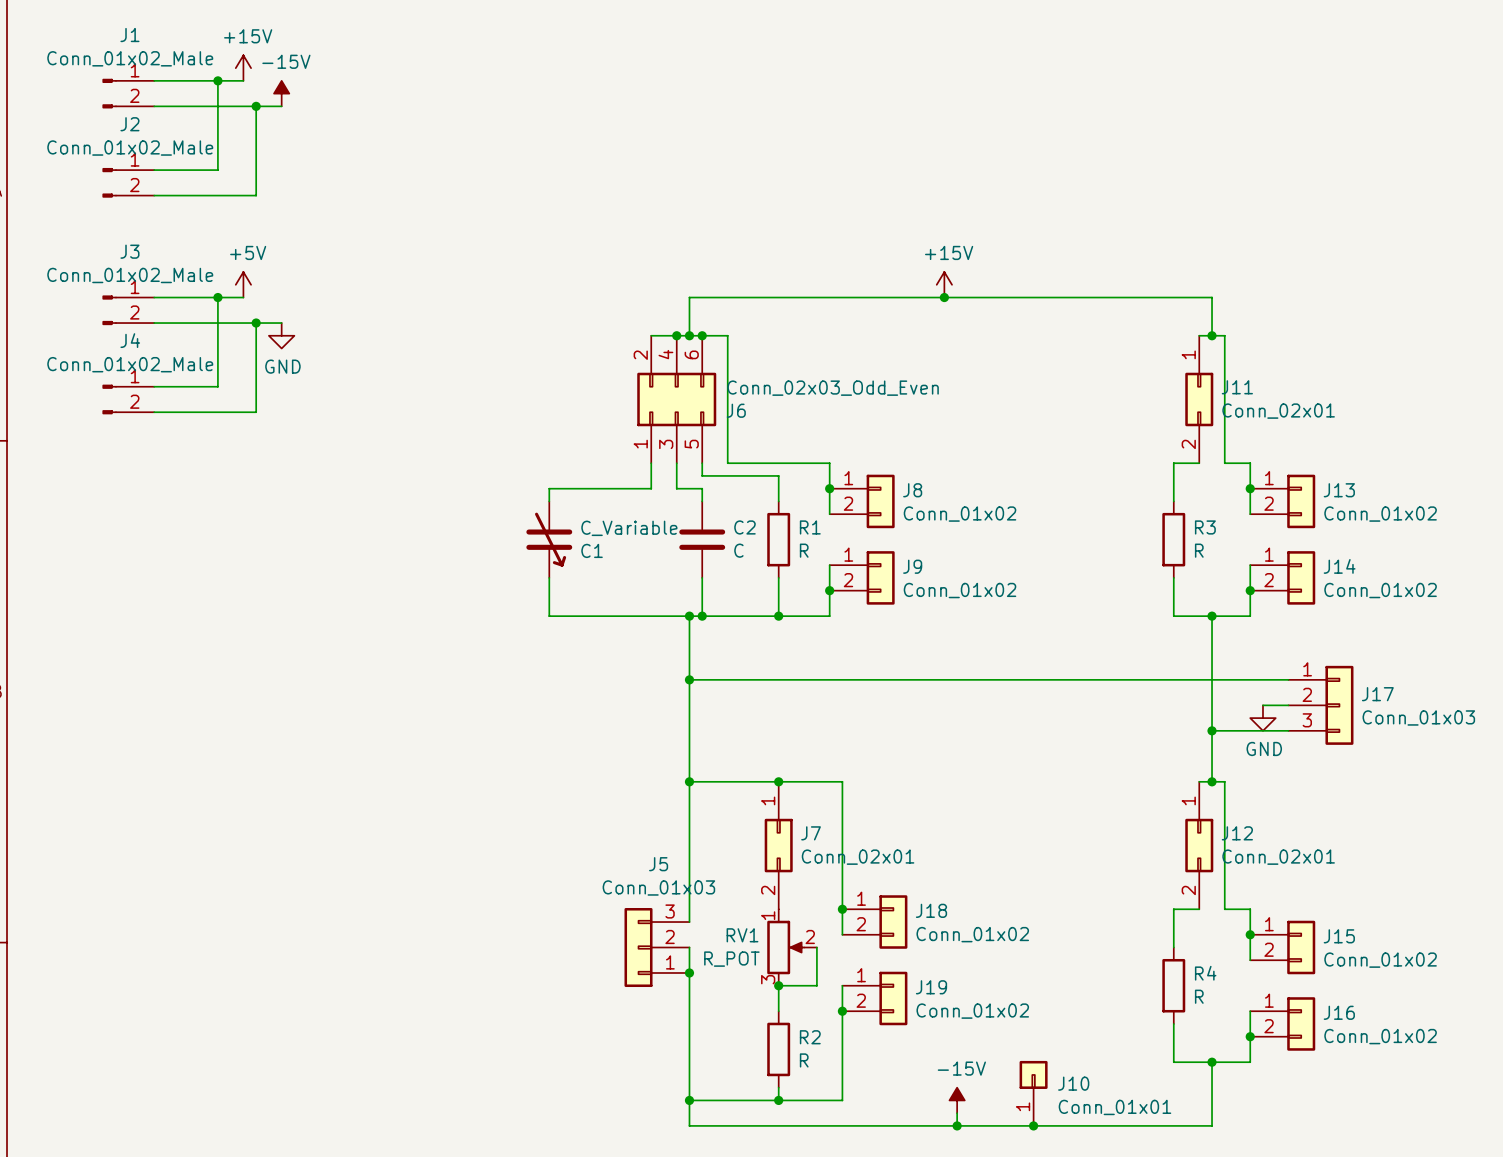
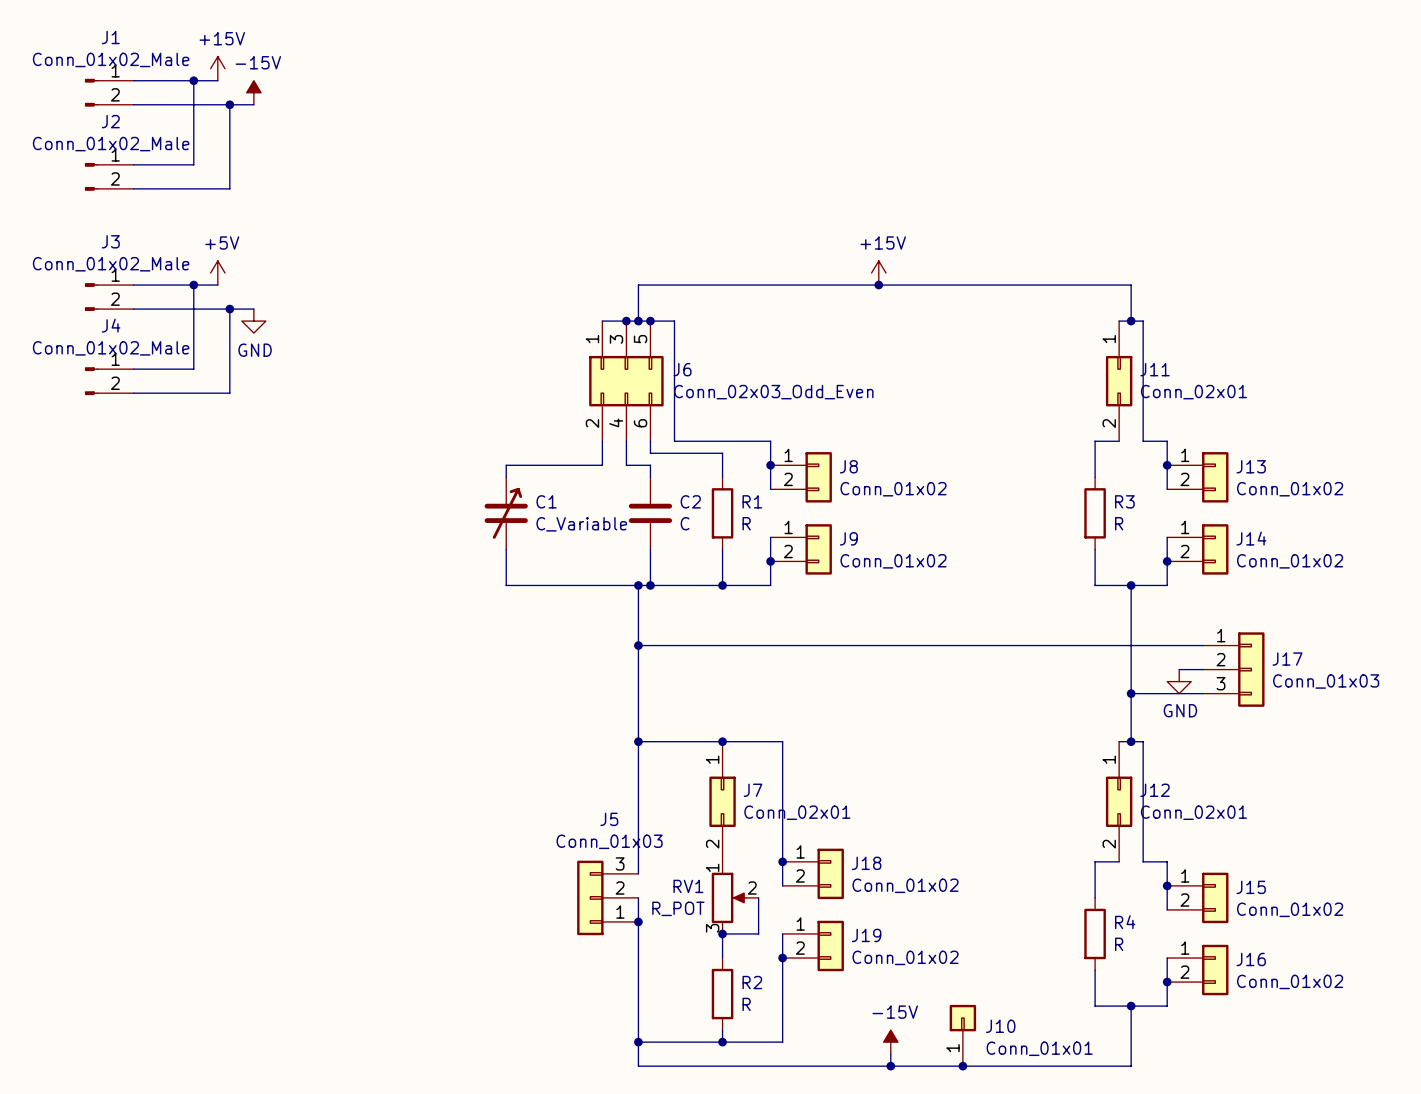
J6 flip: as is (676, 399) -> up-down (626, 381)
C1 flip: as is (549, 539) -> up-down (506, 513)

